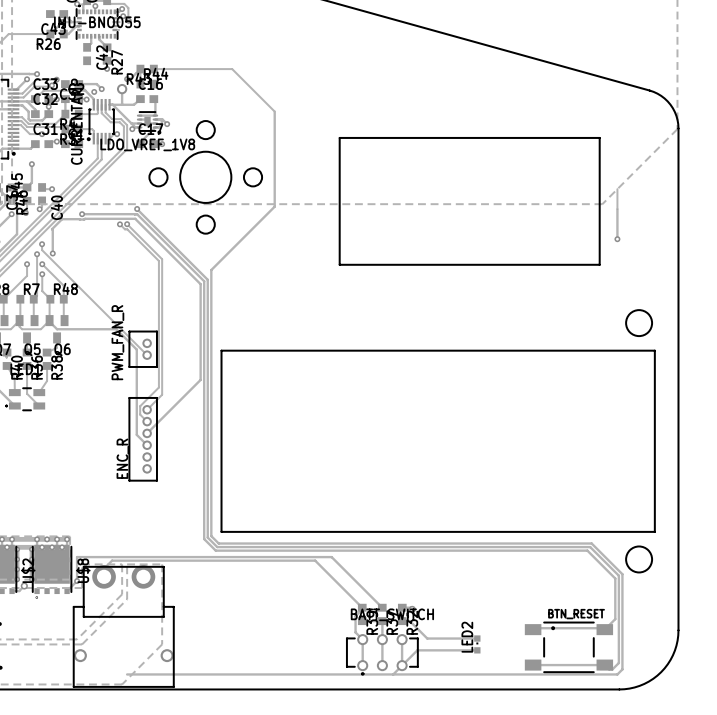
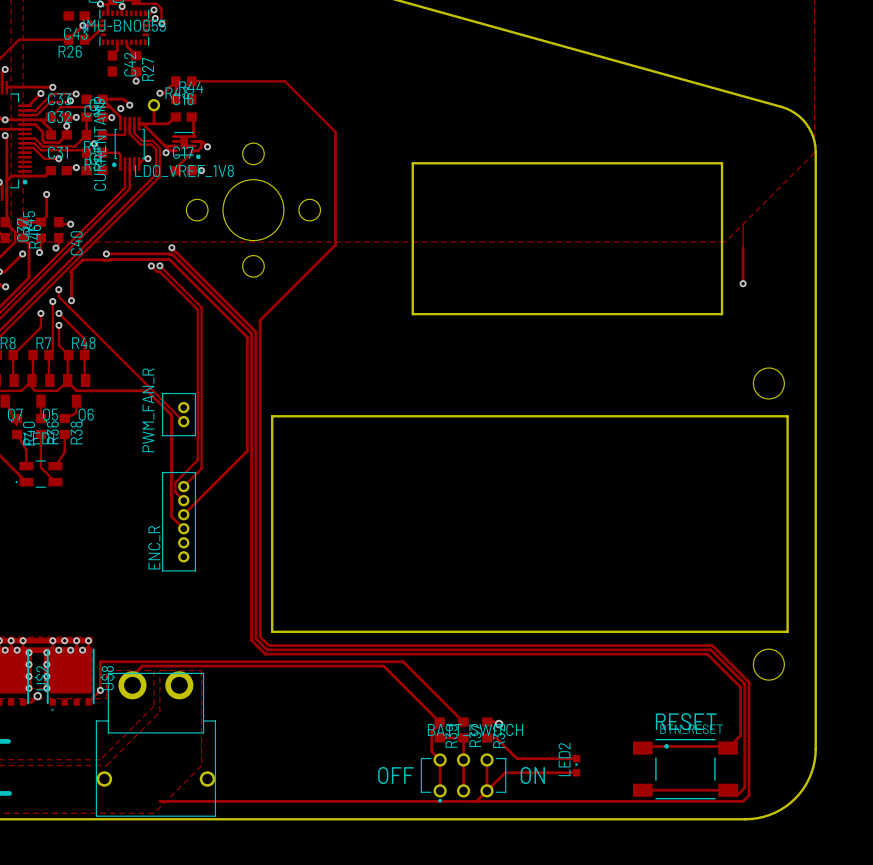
text: none -> RESET (686, 721)
text: none -> OFF (395, 775)
text: none -> ON (532, 775)

